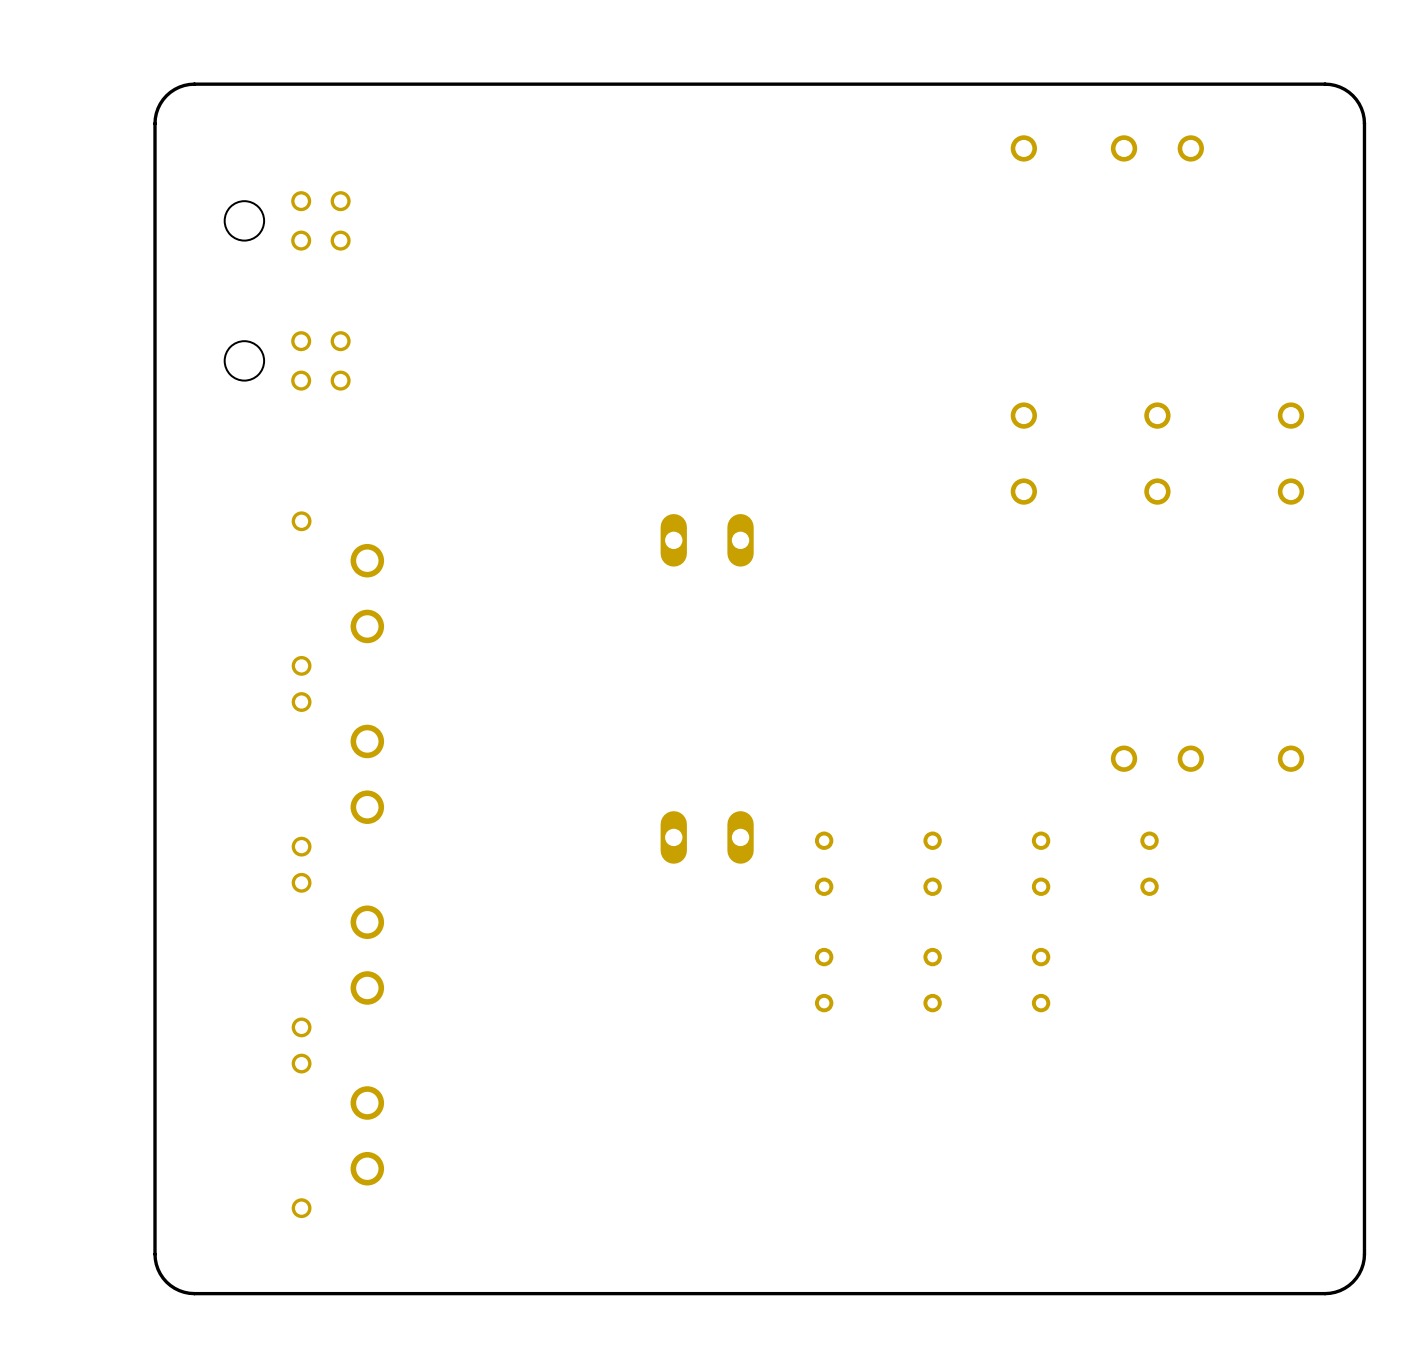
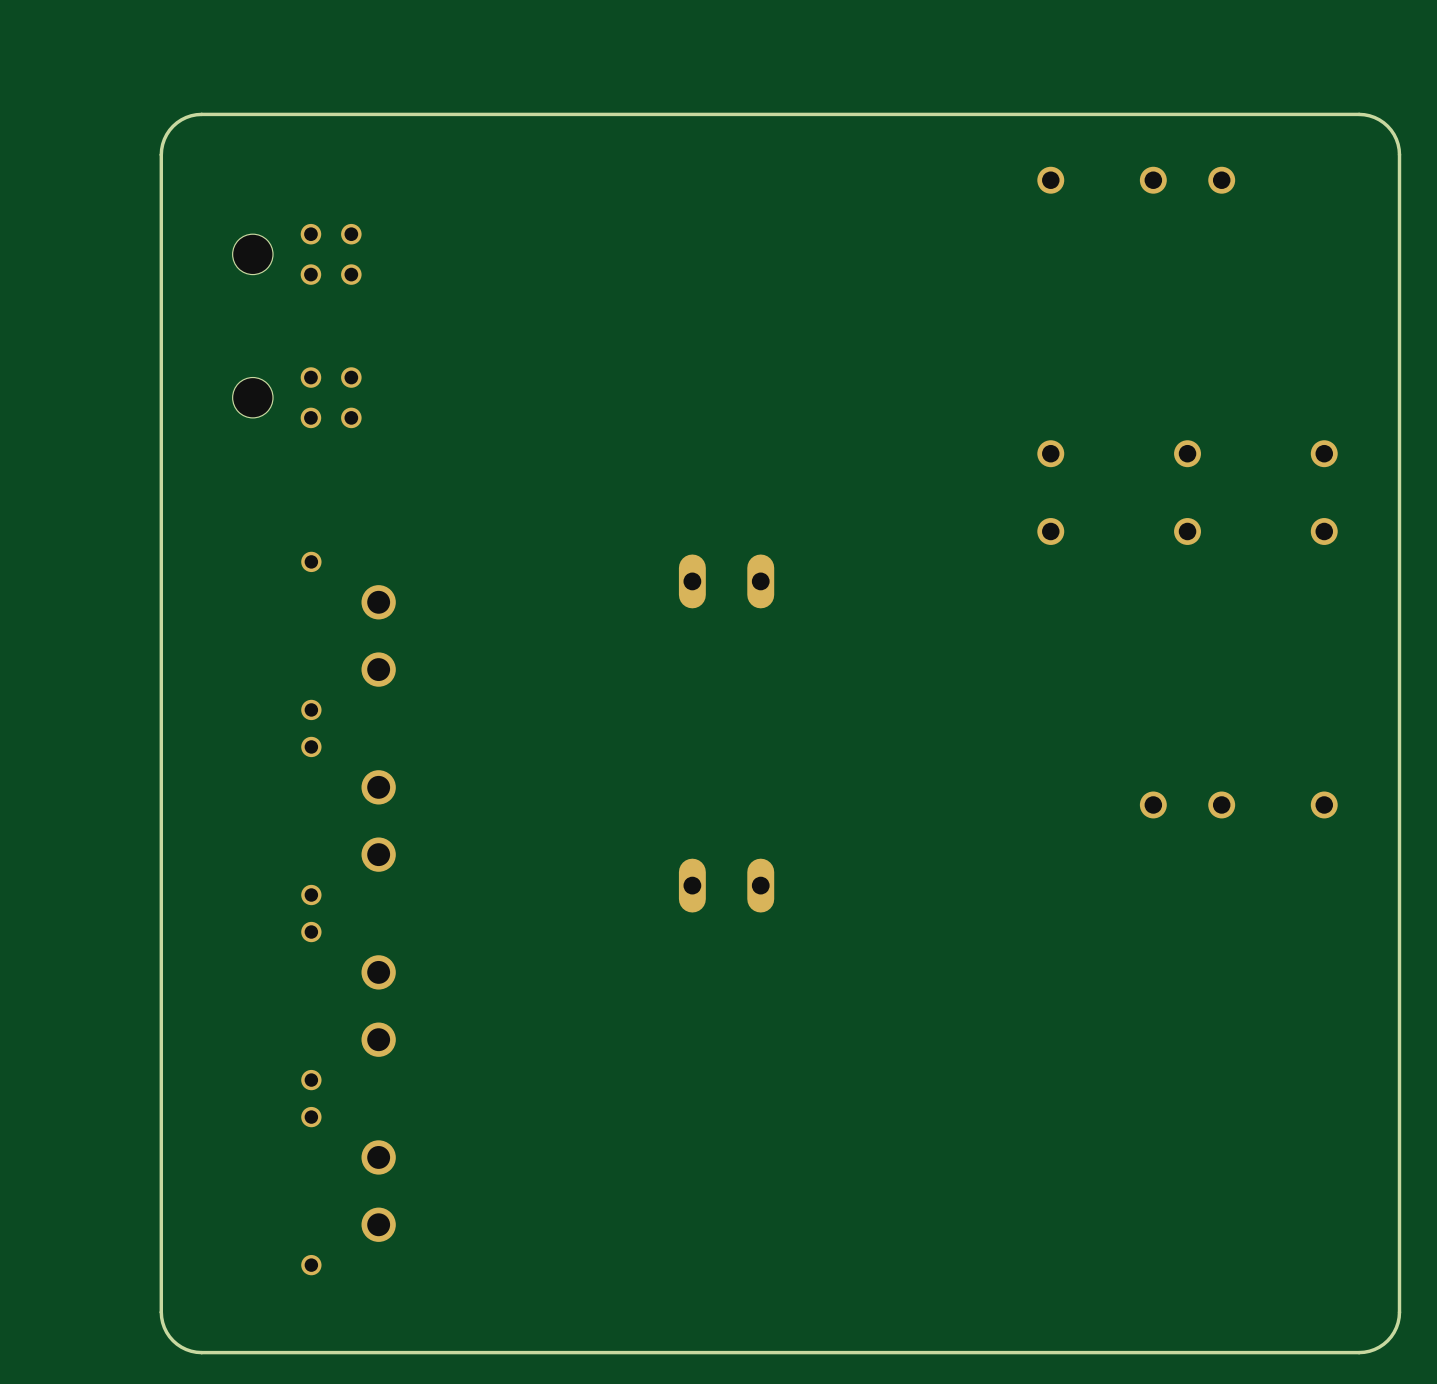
part: (824, 863) -> none
part: (932, 863) -> none
part: (1041, 863) -> none
part: (1149, 863) -> none
part: (824, 980) -> none
part: (932, 980) -> none
part: (1041, 980) -> none

